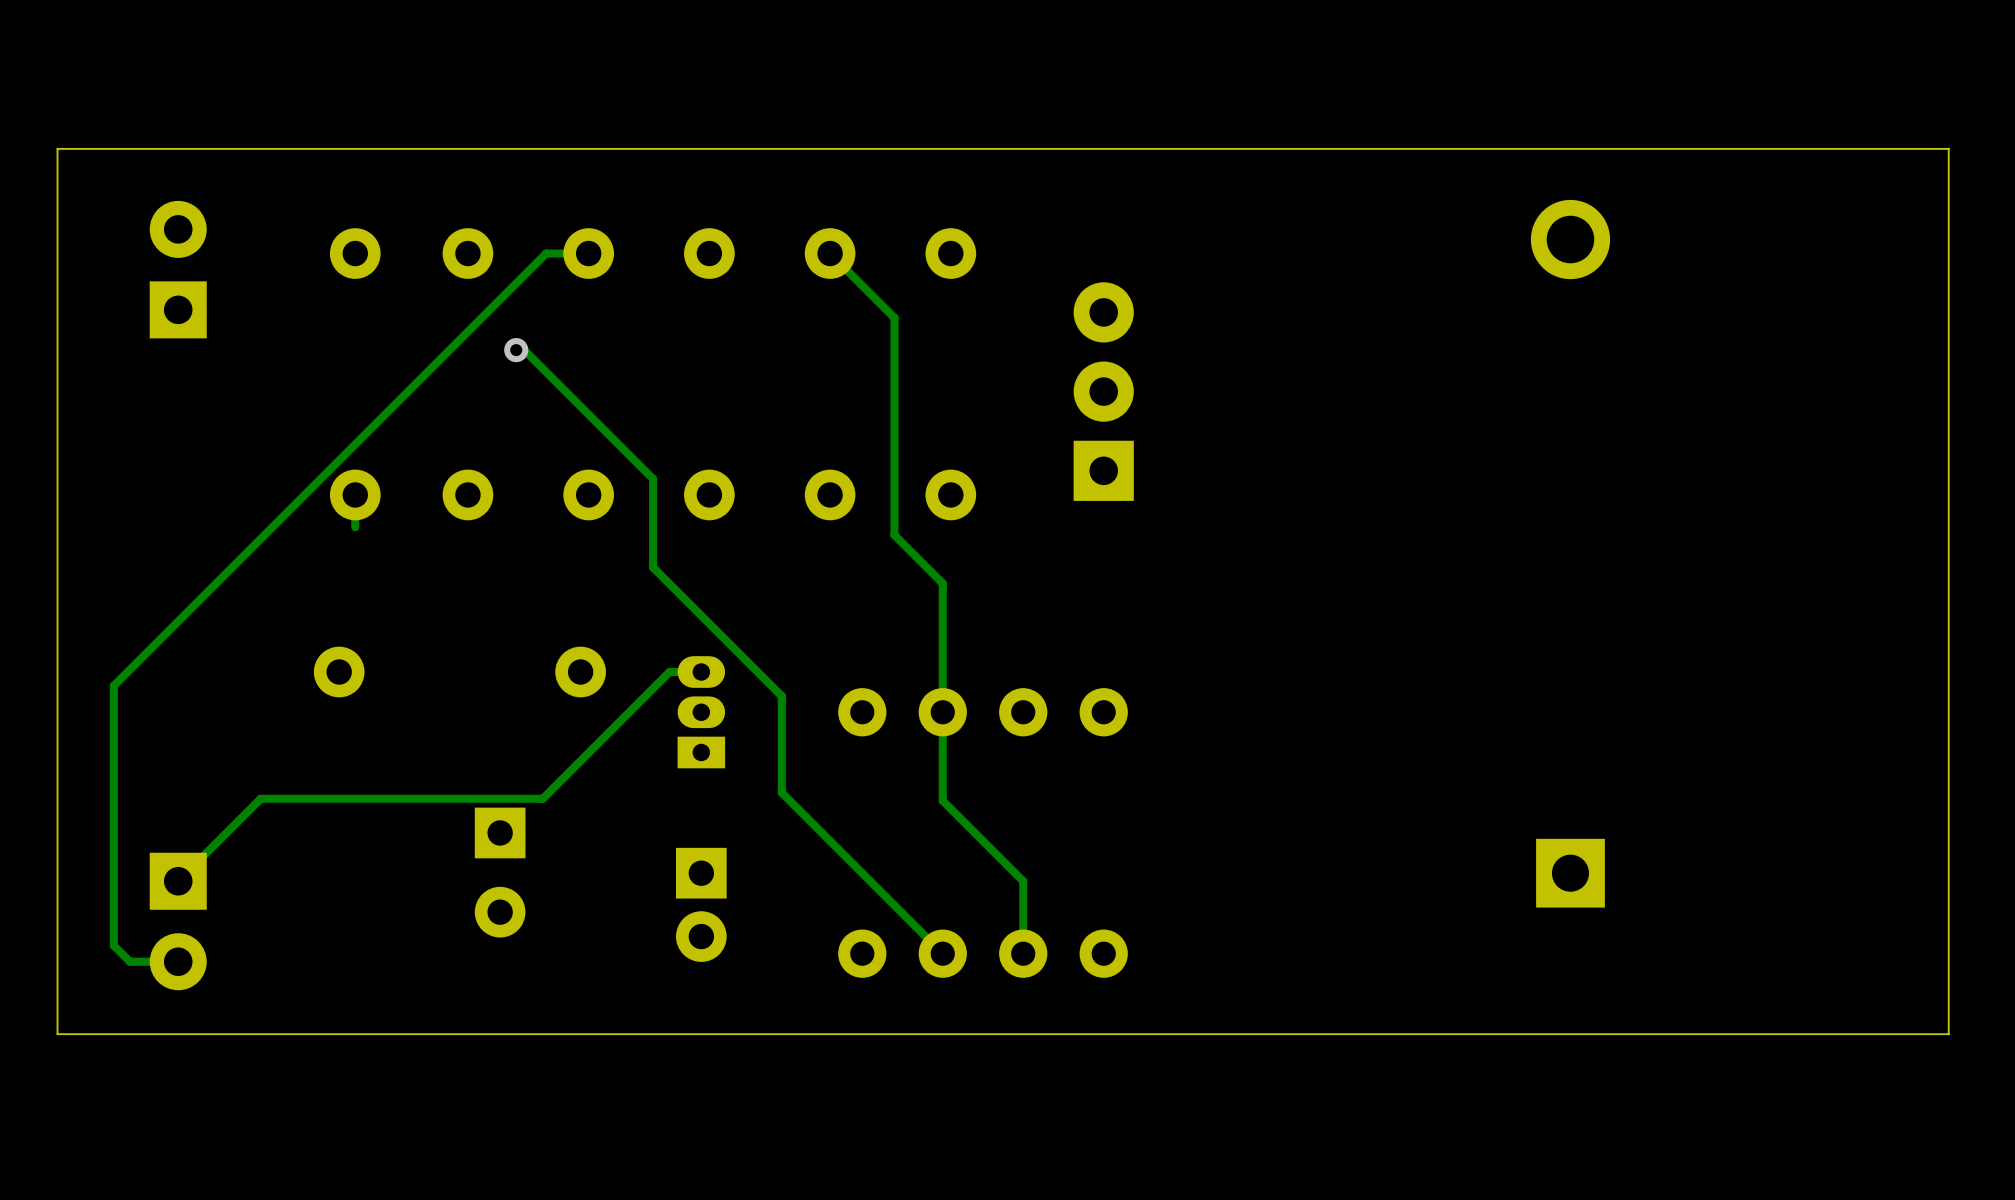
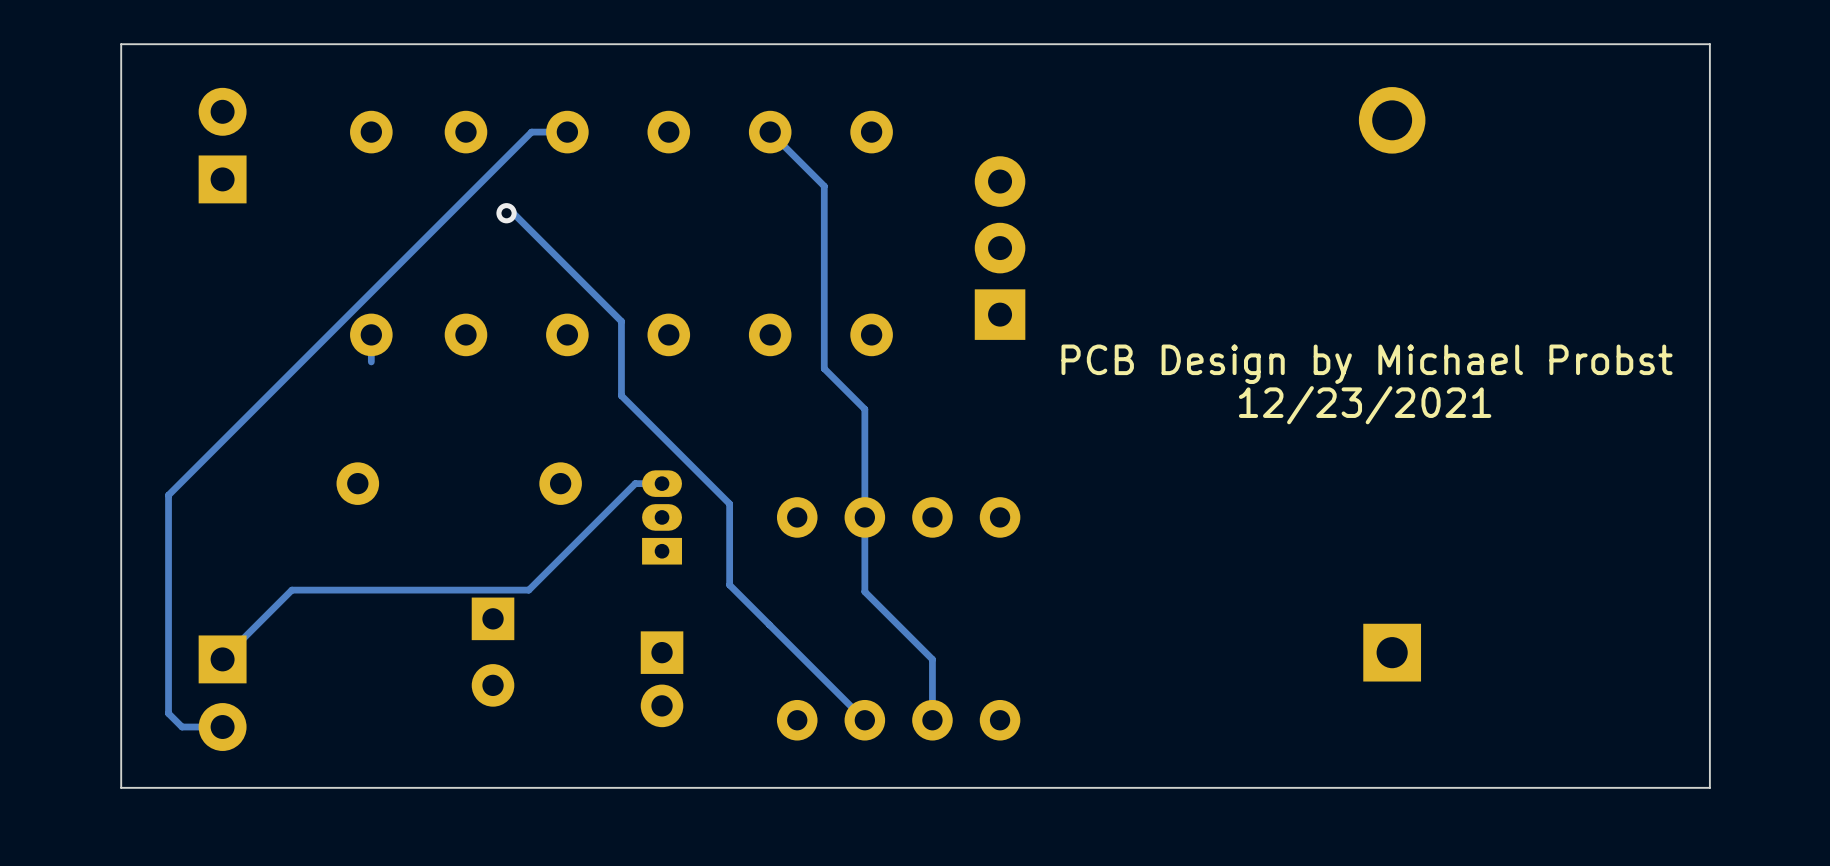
text: none -> PCB Design by Michael Probst (1367, 364)
text: none -> 12/23/2021 (1365, 405)

